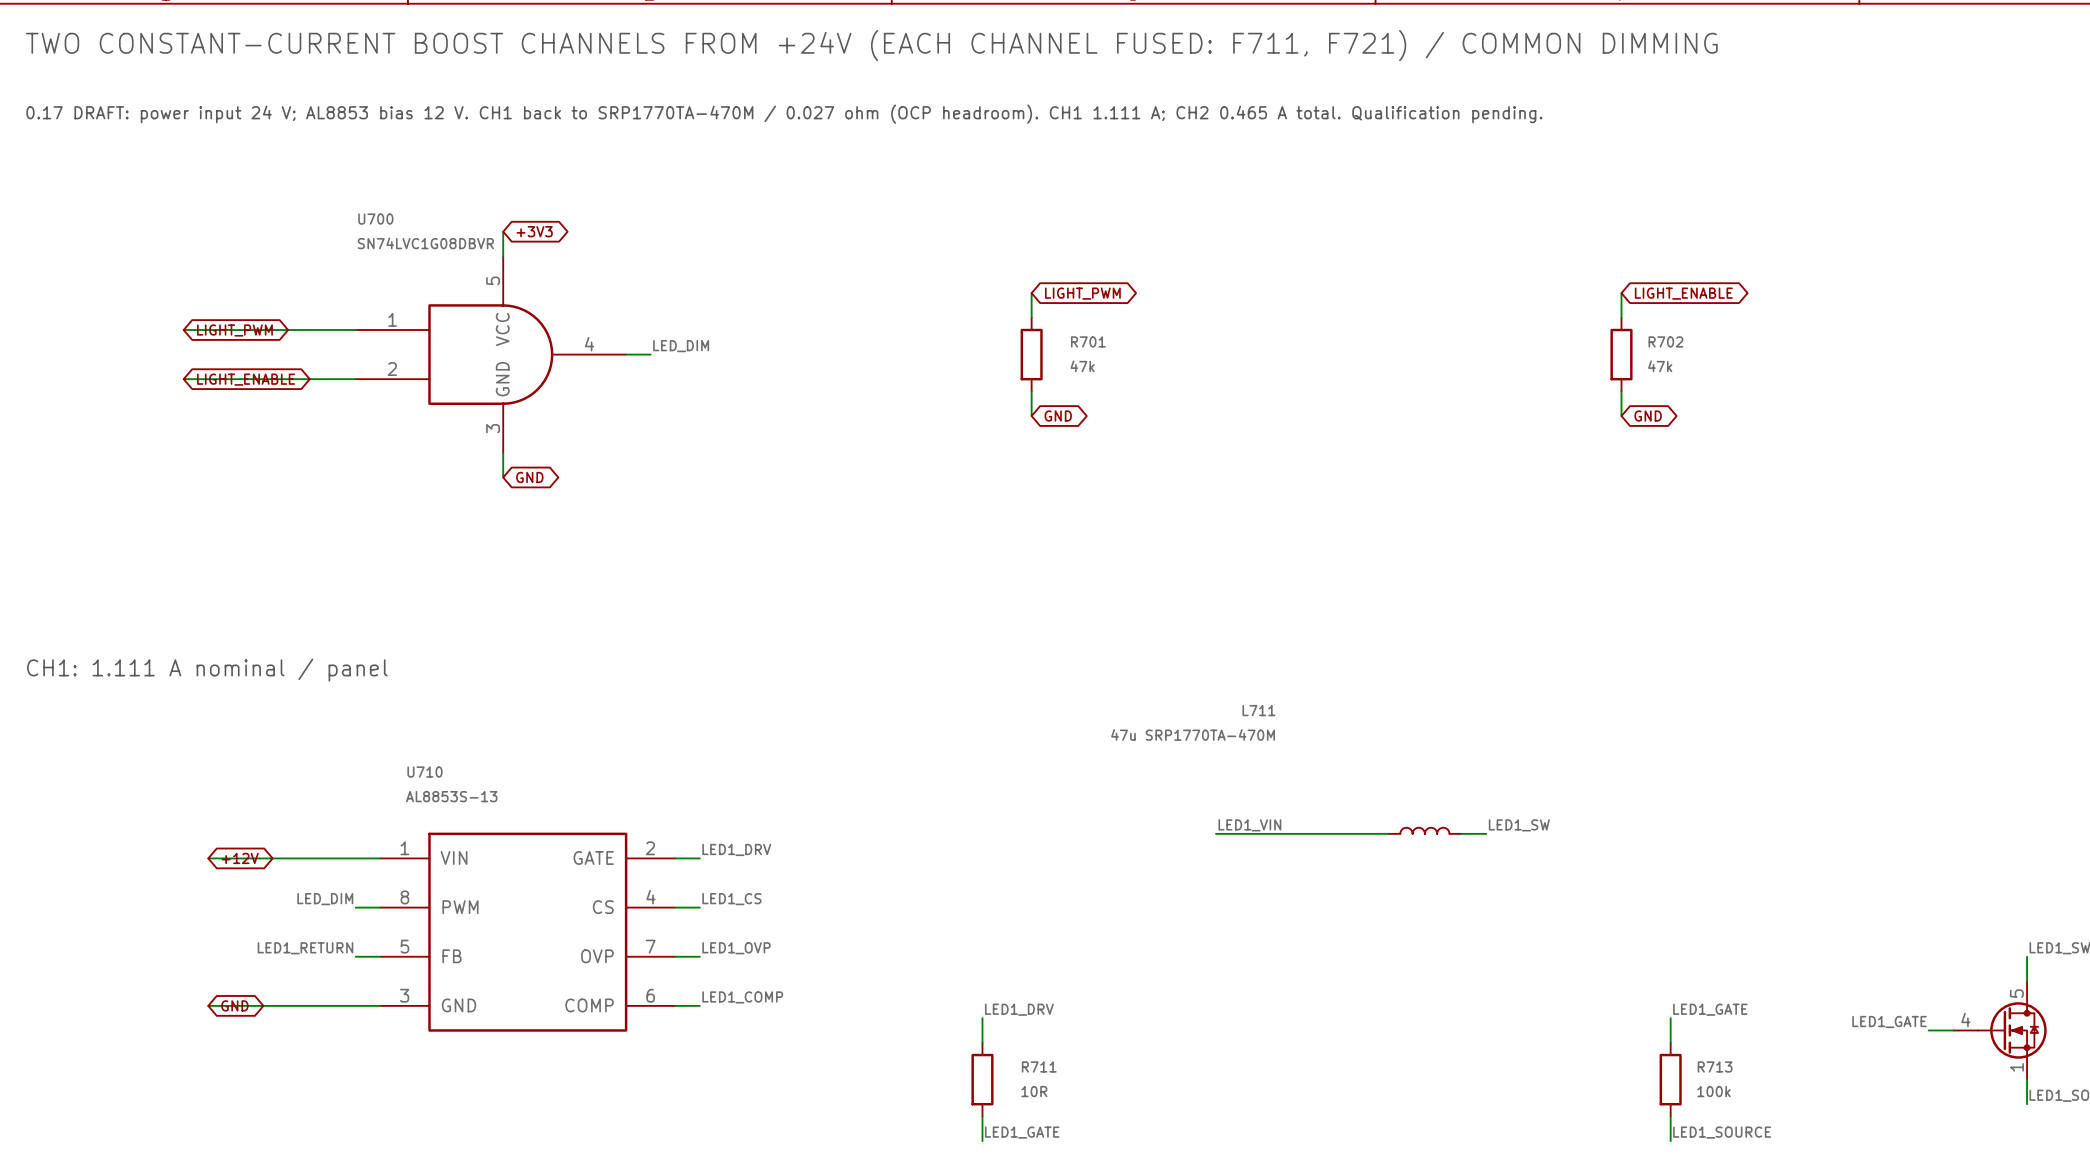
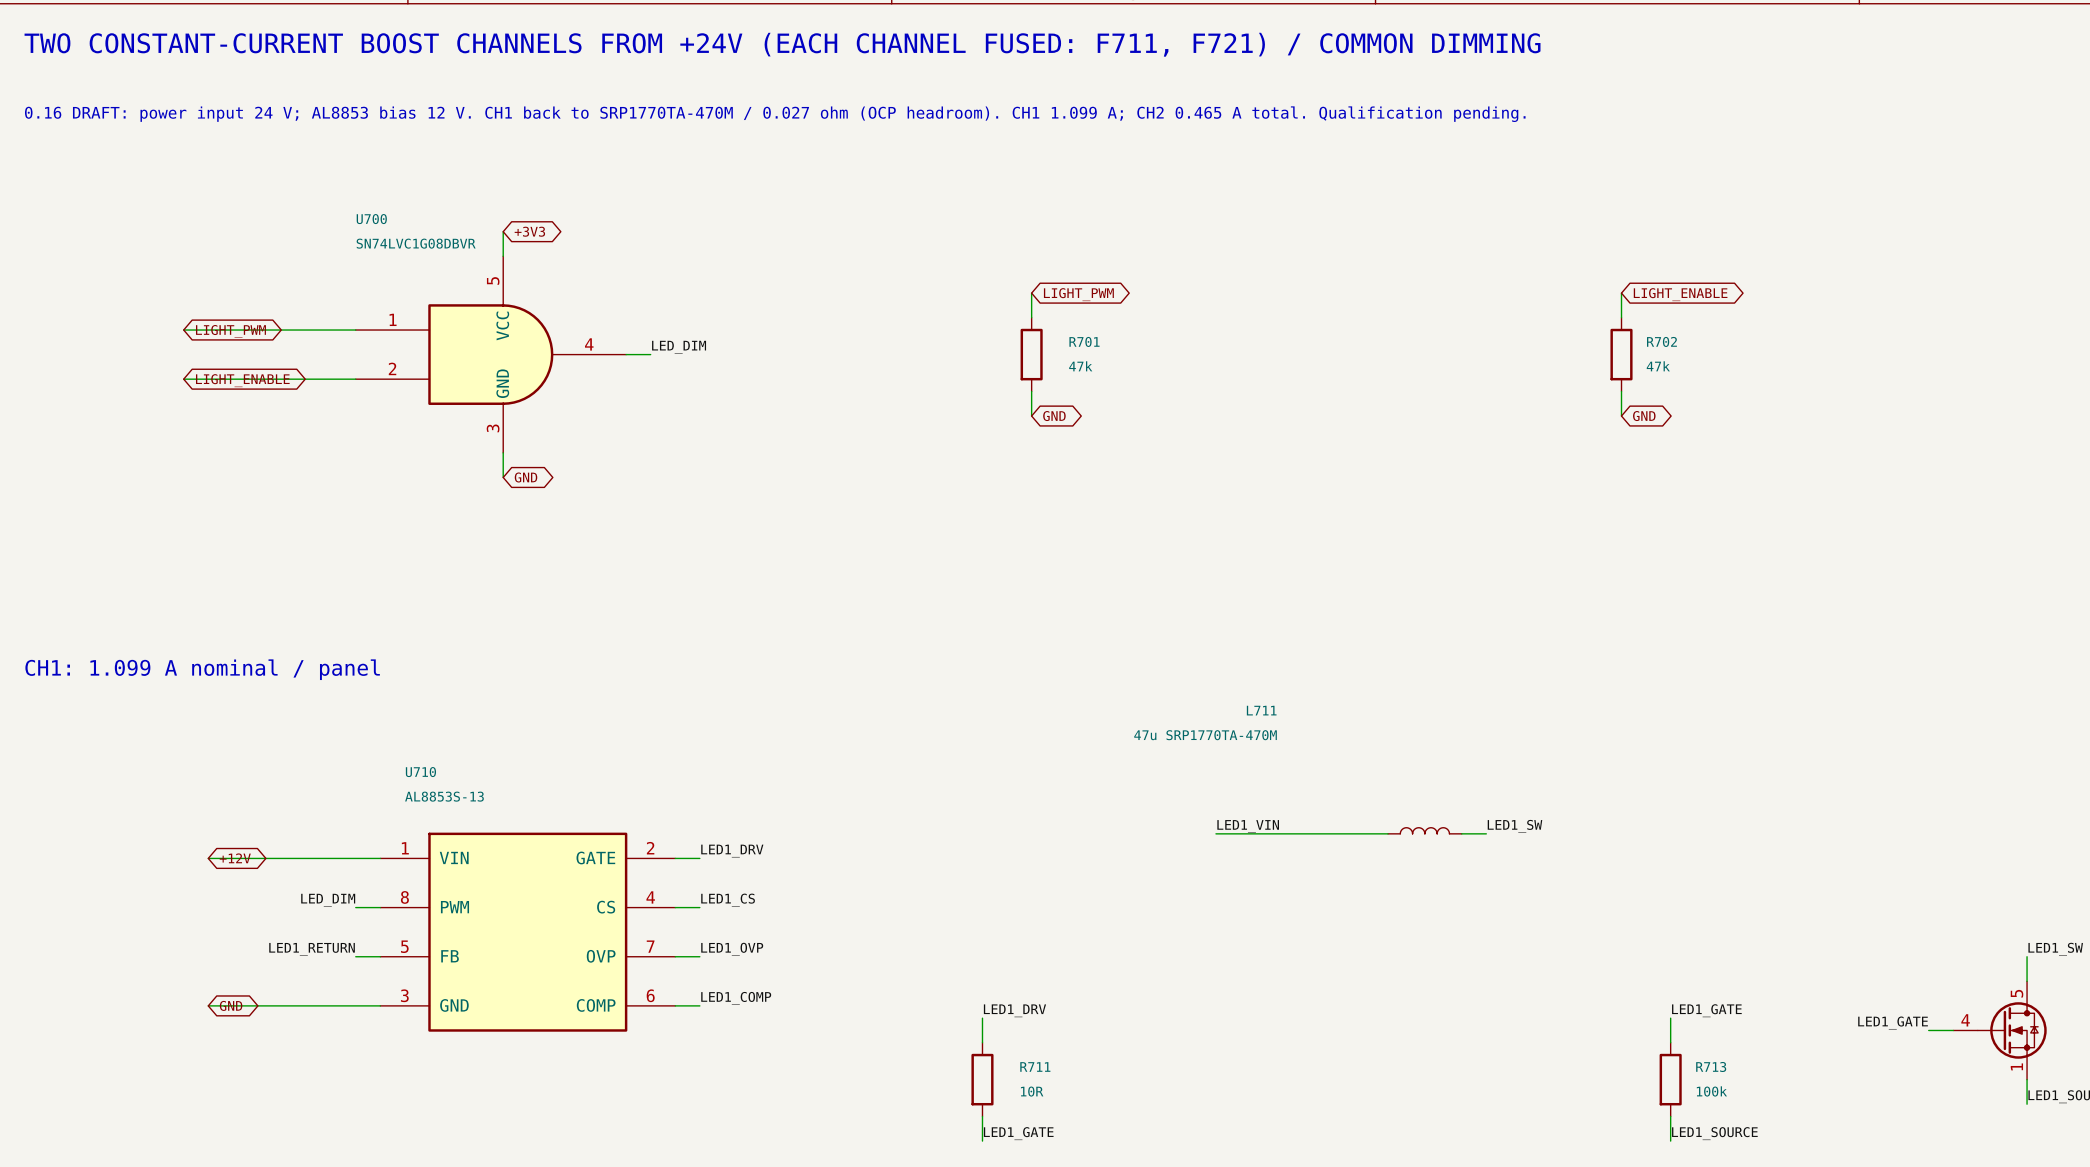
text: 0.17 DRAFT: power input 24 V; AL8853 bias 12 V. CH1 back to SRP1770TA-470M / 0.027 ohm (OCP headroom). CH1 1.111 A; CH2 0.465 A total. Qualification pending. (784, 114) -> 0.16 DRAFT: power input 24 V; AL8853 bias 12 V. CH1 back to SRP1770TA-470M / 0.027 ohm (OCP headroom). CH1 1.099 A; CH2 0.465 A total. Qualification pending. (775, 114)
text: CH1: 1.111 A nominal / panel (207, 670) -> CH1: 1.099 A nominal / panel (202, 669)

